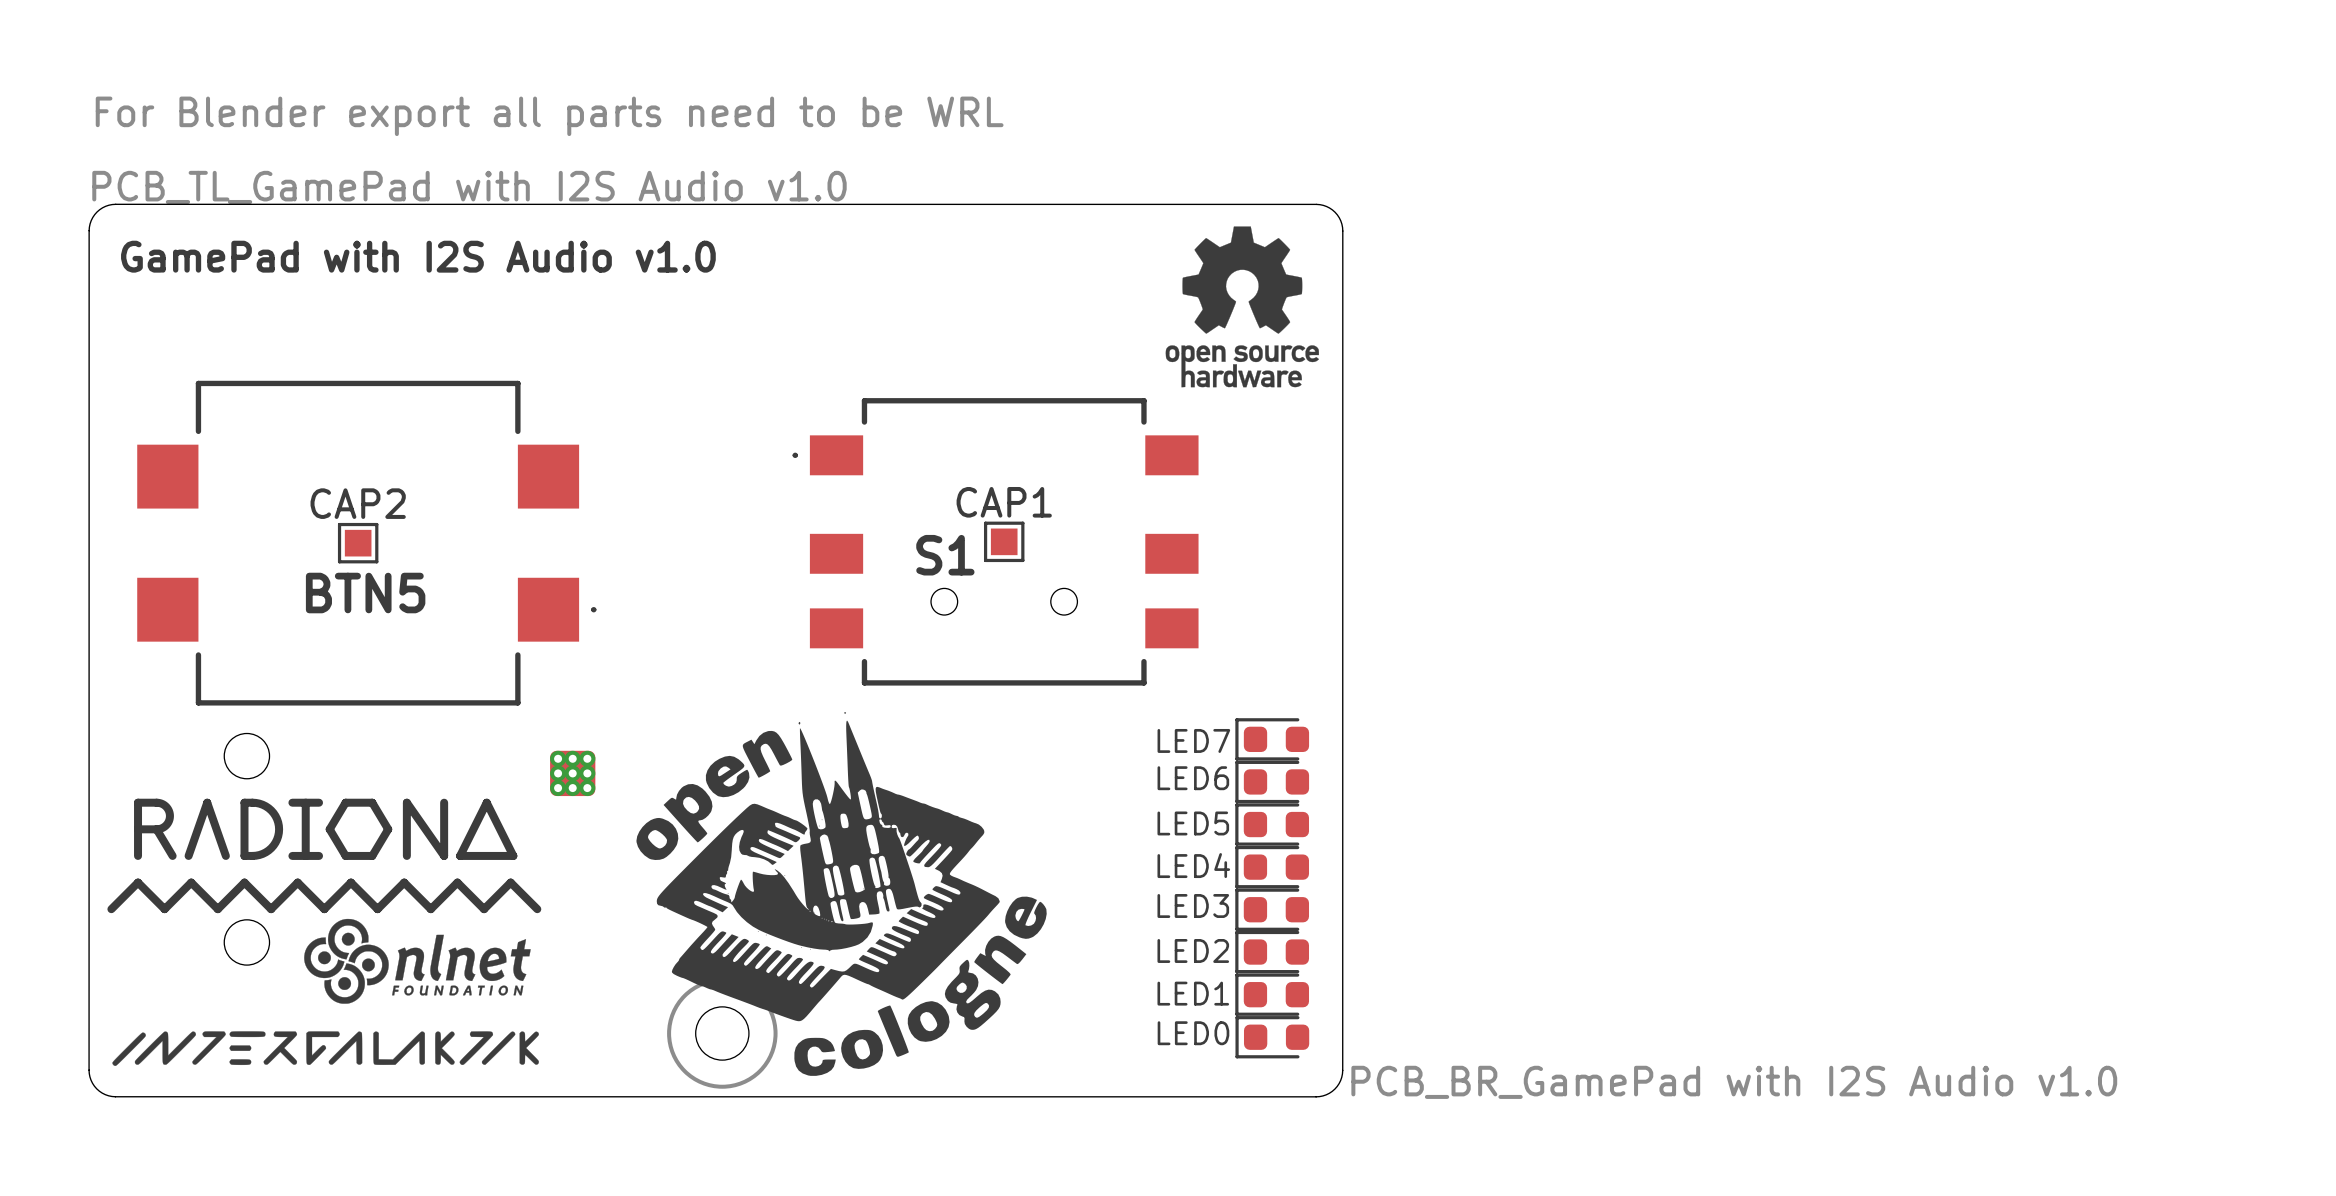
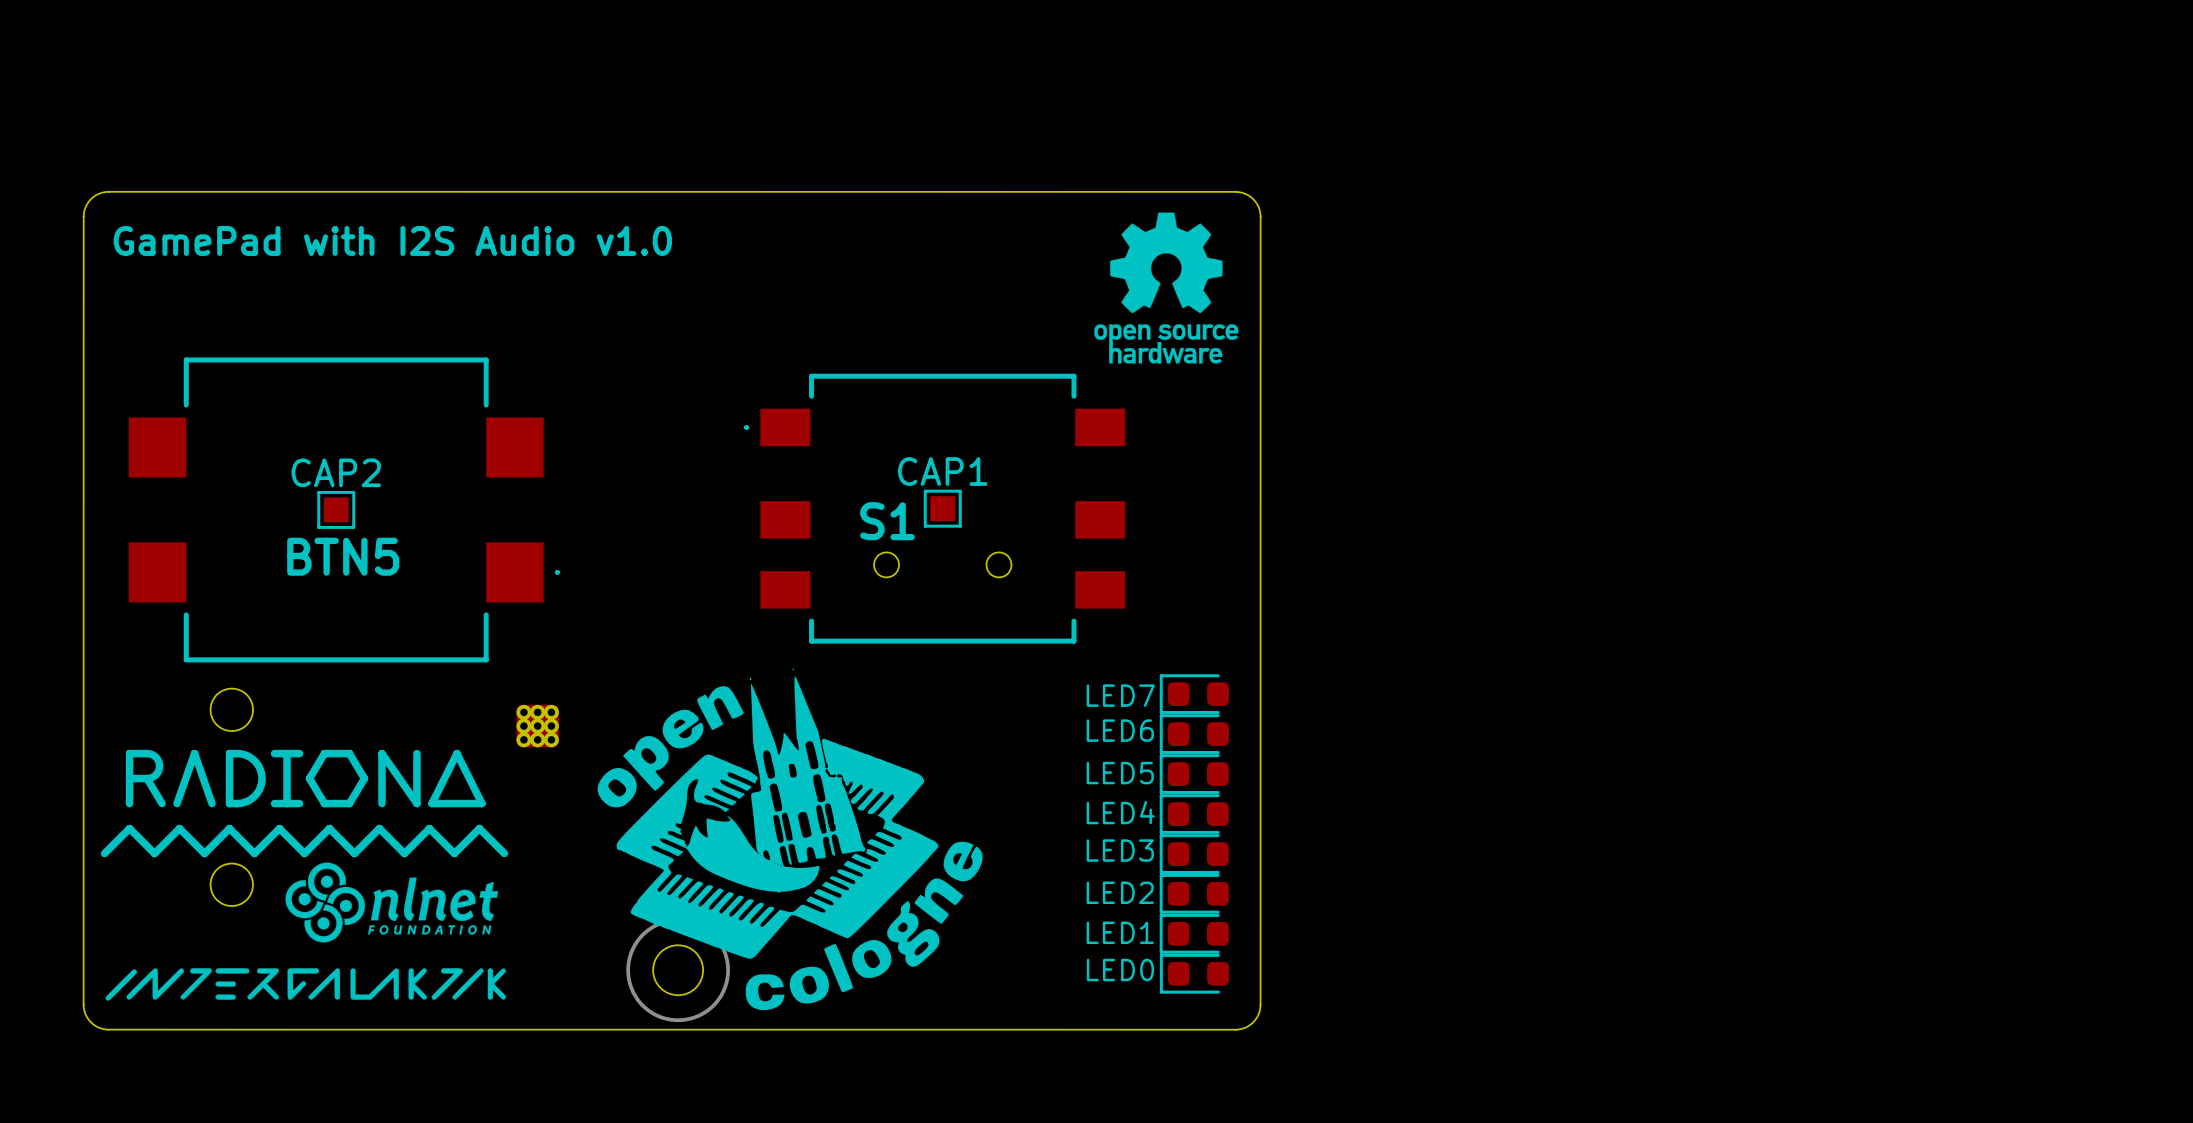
text: For Blender export all parts need to be WRL (549, 116) -> none
text: PCB_TL_GamePad with I2S Audio v1.0 (469, 187) -> none
text: PCB_BR_GamePad with I2S Audio v1.0 (1734, 1082) -> none

